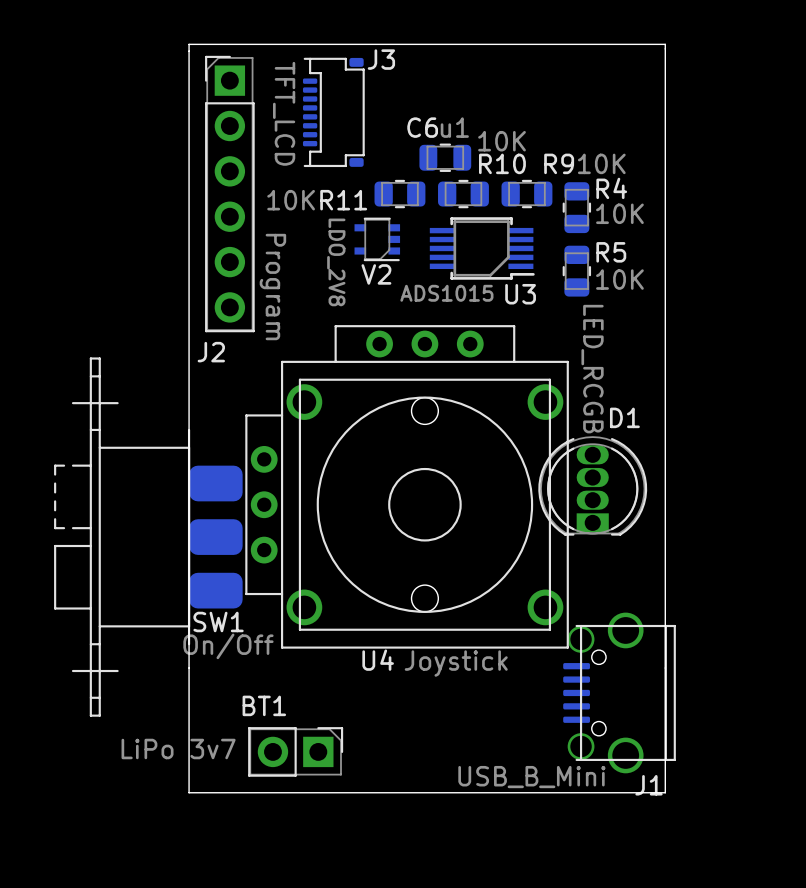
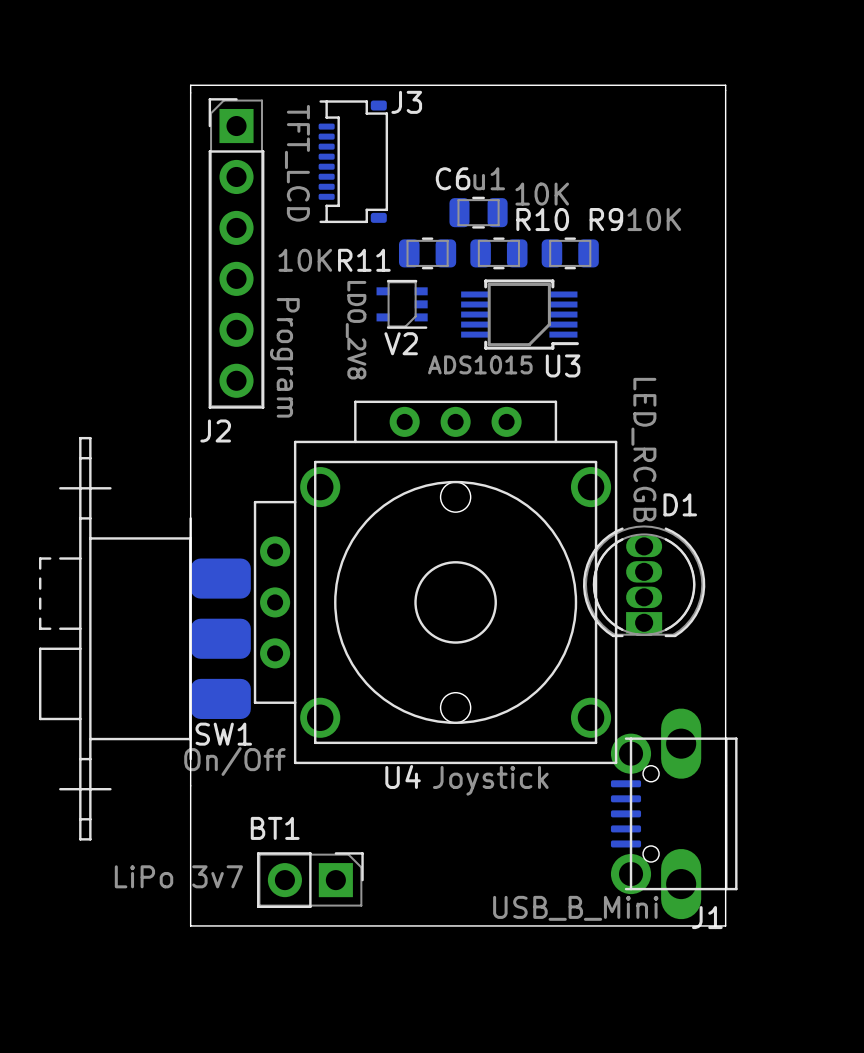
R4: 10K (576, 207) -> none
R5: 10K (576, 271) -> none
J1 footprint: [563, 612, 676, 774] -> [610, 708, 738, 920]

